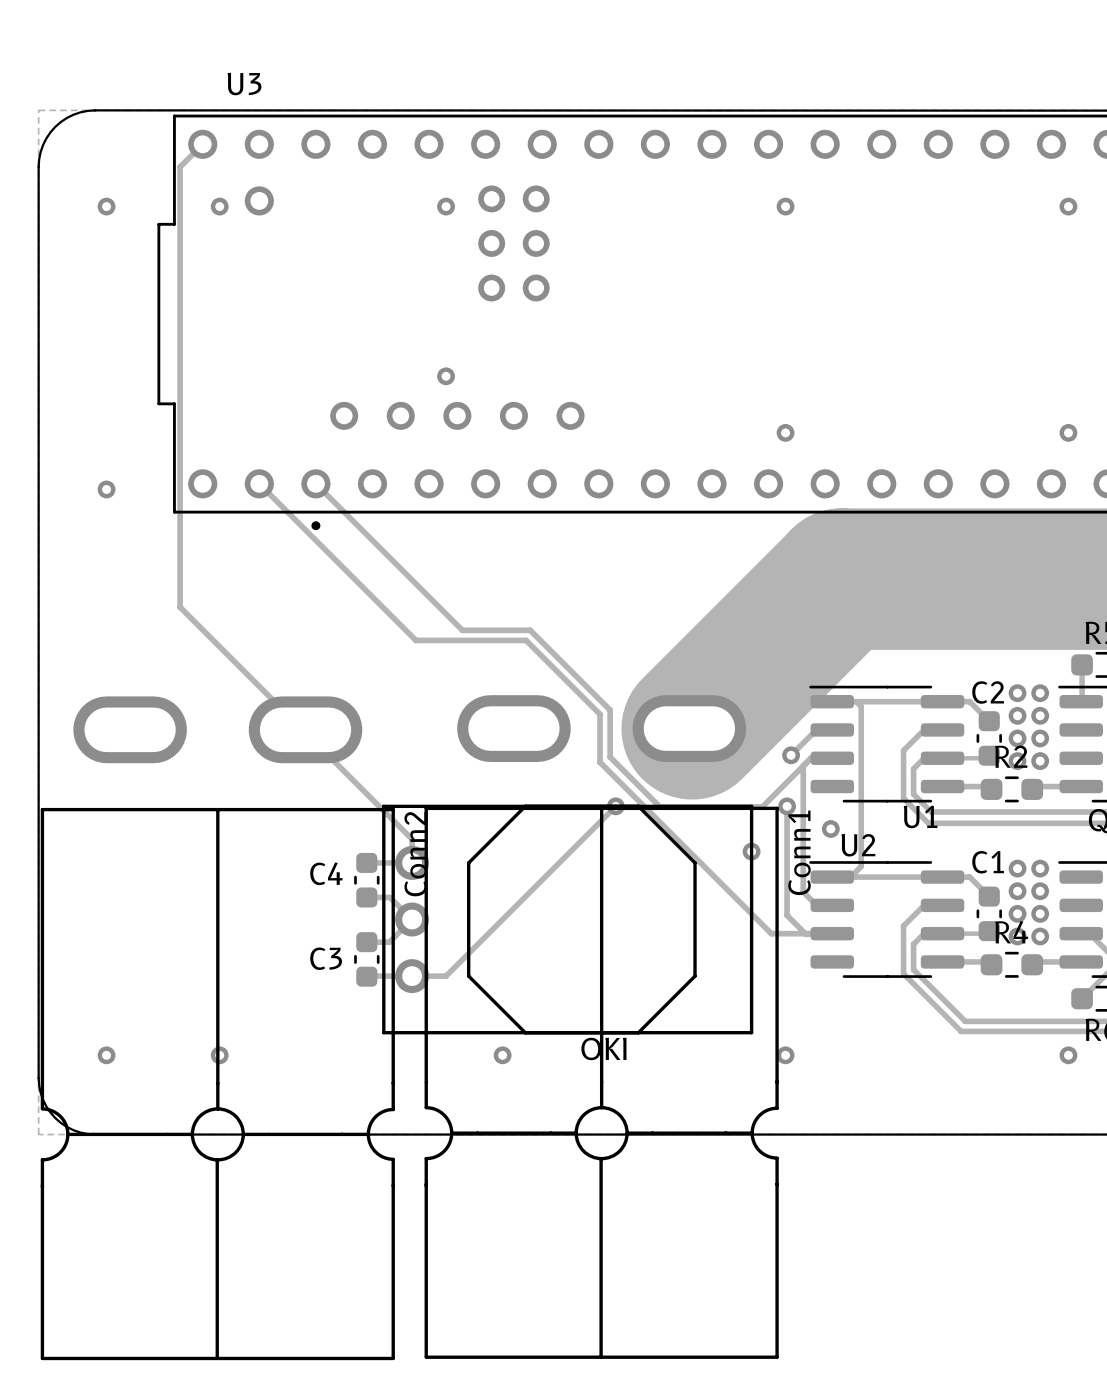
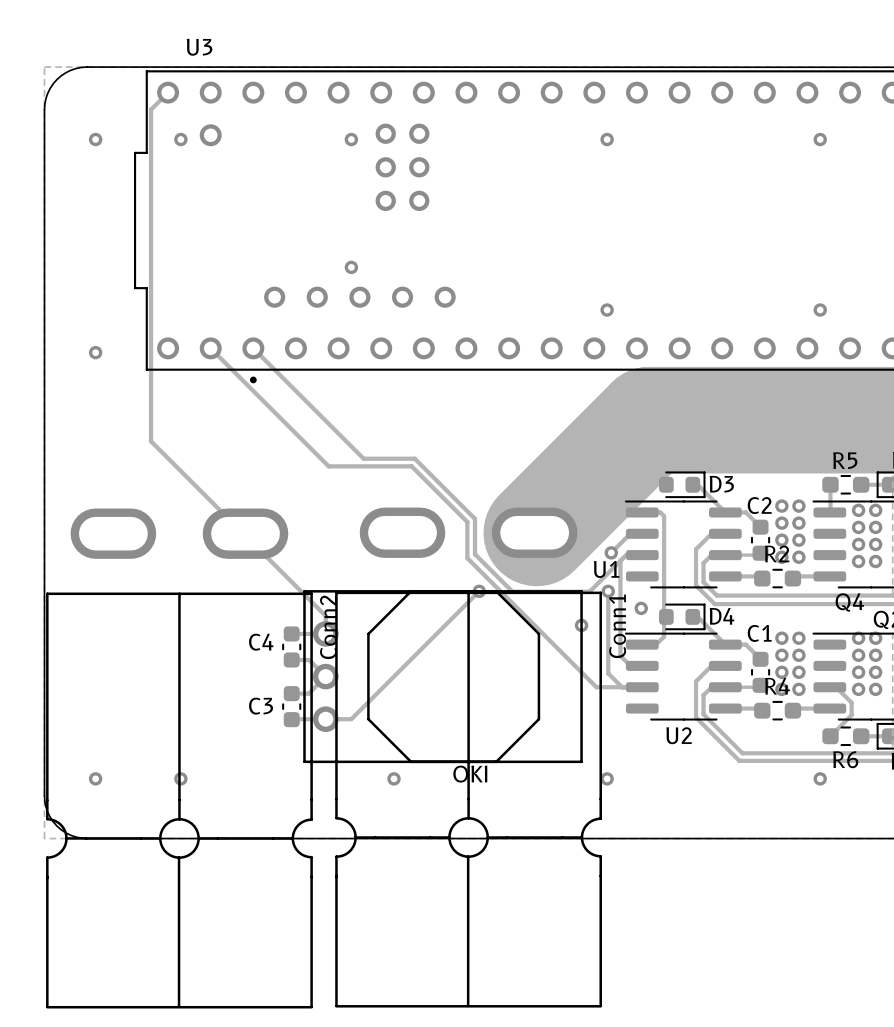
D3: none -> (682, 484)
track: (856, 701) (942, 701) -> (692, 484) (697, 484) (725, 512)
U1 name position: U1 (920, 816) -> U1 (606, 569)
D4: none -> (682, 616)
U2 name position: U2 (858, 845) -> U2 (679, 735)
track: (850, 877) (942, 877) -> (692, 616) (697, 616) (725, 644)

